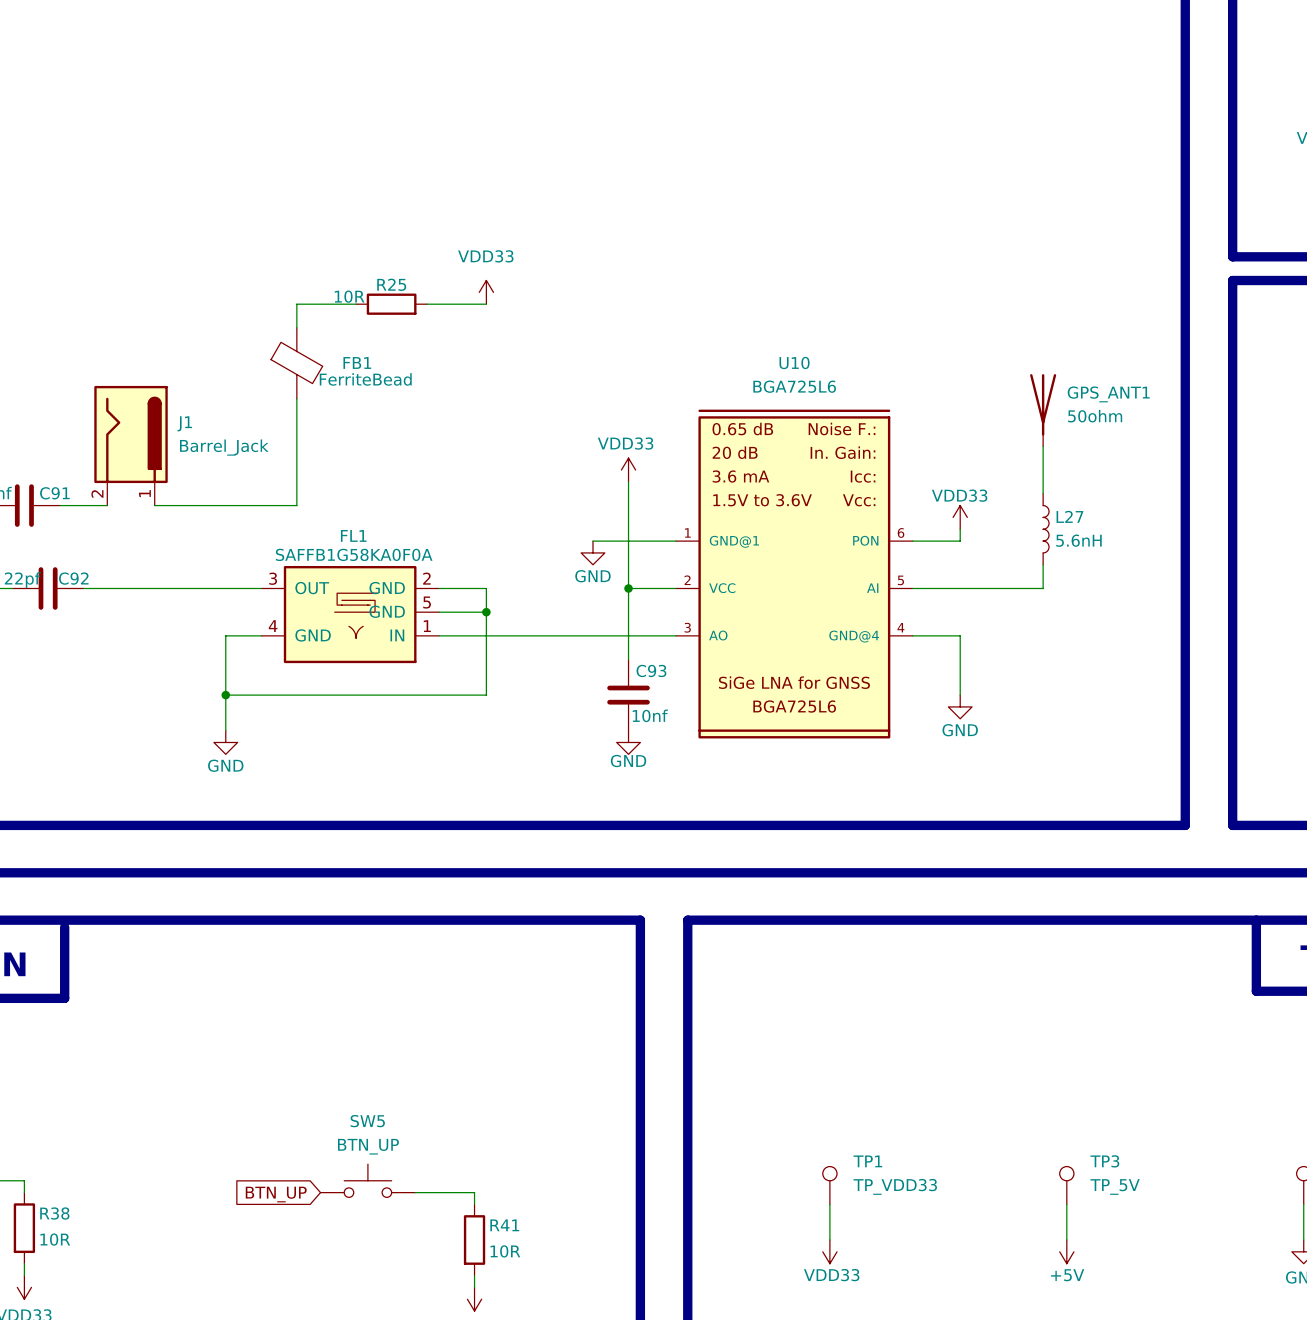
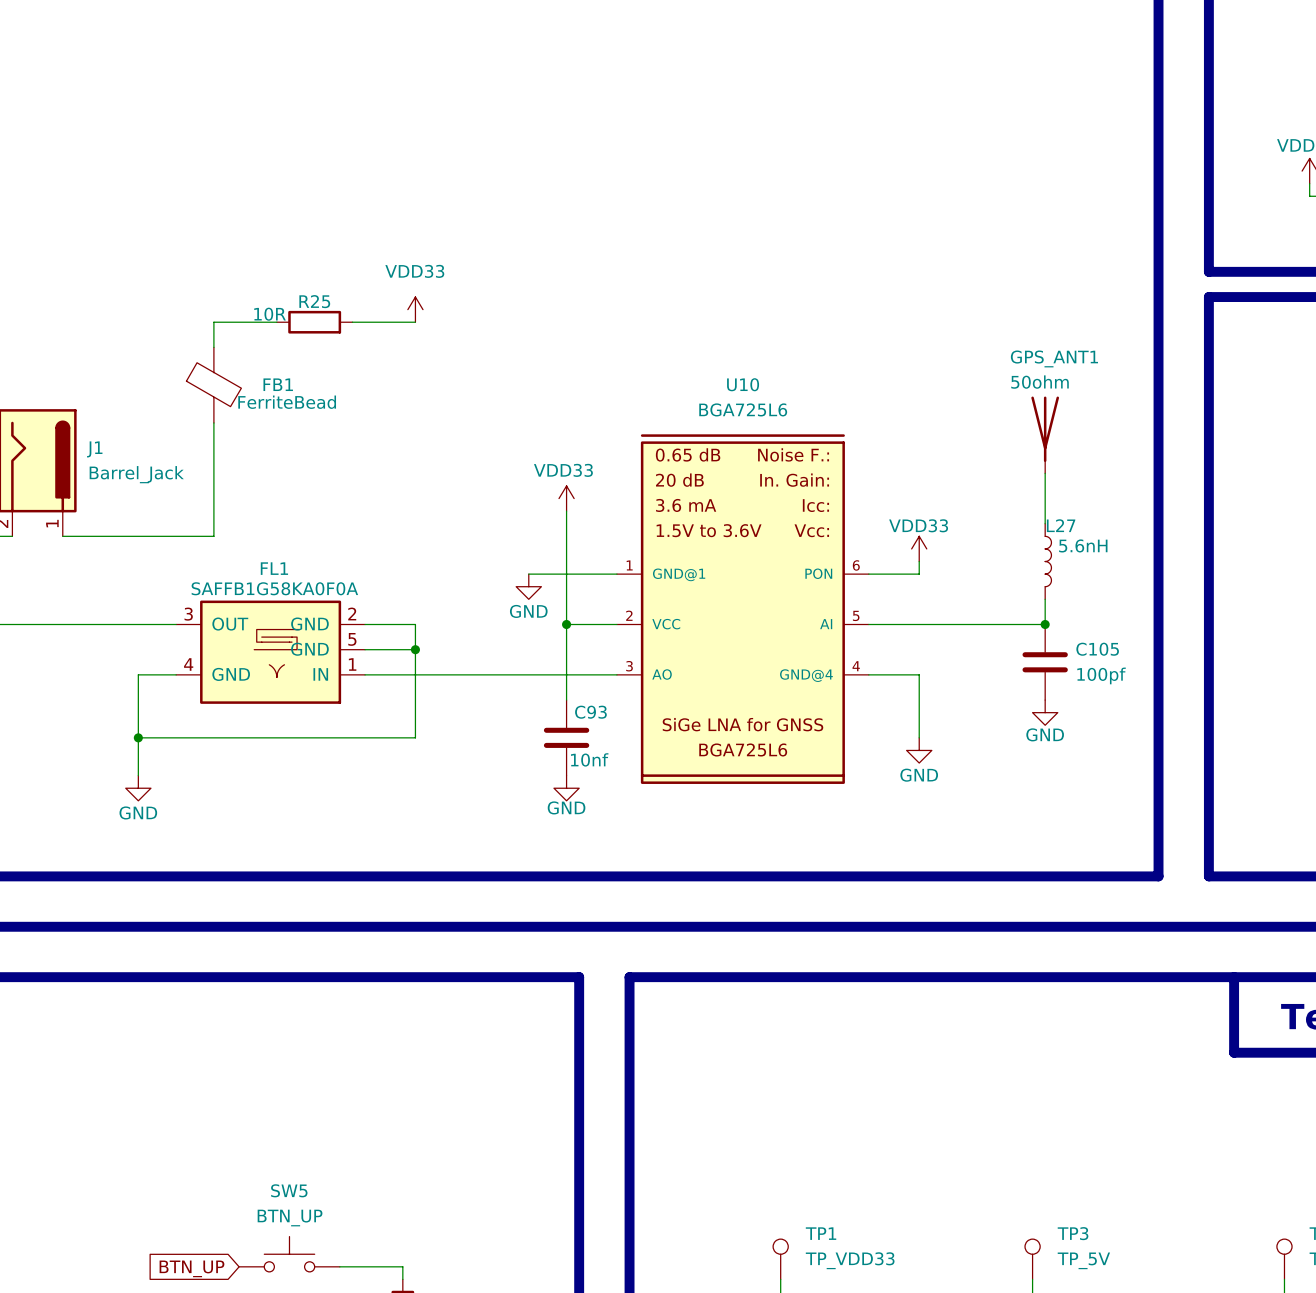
GPS_ANT1 name position: GPS_ANT1 (1108, 394) -> GPS_ANT1 (1054, 358)
GPS_ANT1 position: (1043, 410) -> (1045, 434)
GPS_ANT1 value position: 50ohm (1095, 416) -> 50ohm (1040, 382)
wire: (1043, 446) (1043, 493) -> (1045, 473) (1045, 523)
L27 name position: L27 (1069, 516) -> L27 (1061, 525)
L27 position: (1046, 529) -> (1048, 561)
L27 value position: 5.6nH (1078, 540) -> 5.6nH (1083, 545)
wire: (1043, 564) (1043, 588) -> (1045, 599) (1045, 624) (1007, 624)
junction: none -> (1045, 624)
C105: none -> 100pf (1045, 662)
power symbol: none -> GND (1045, 712)

